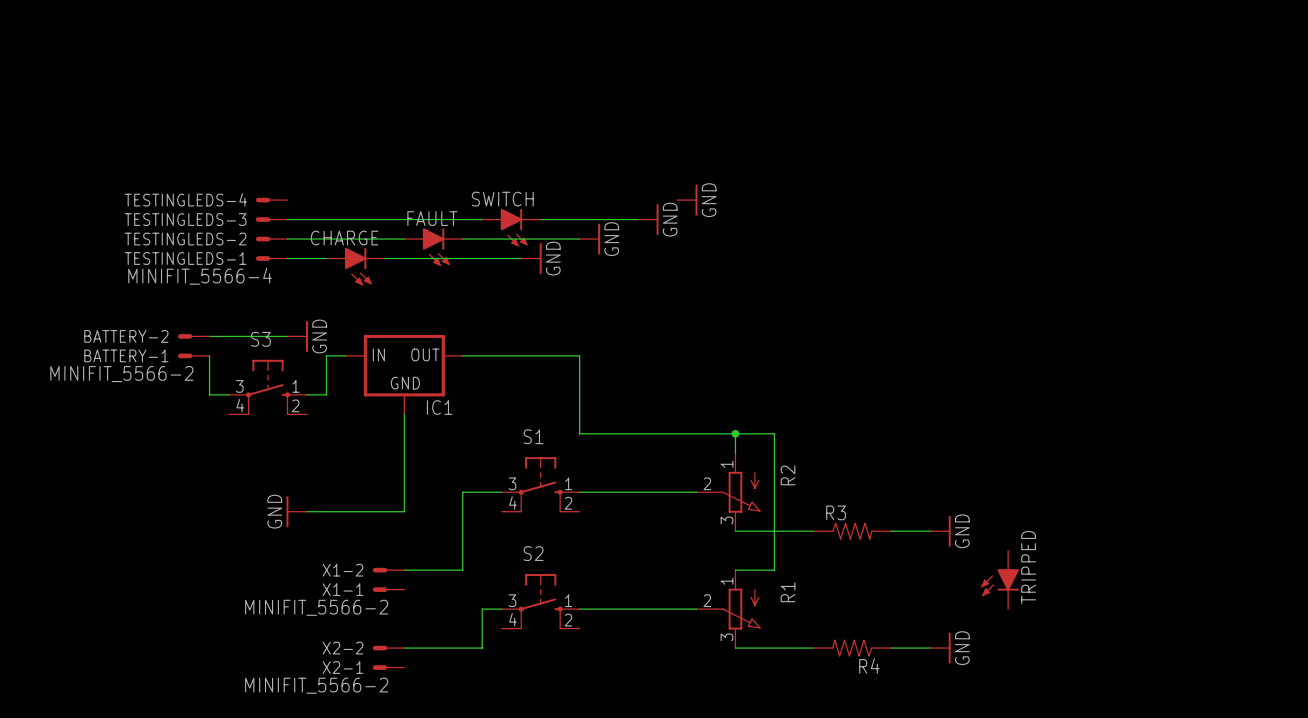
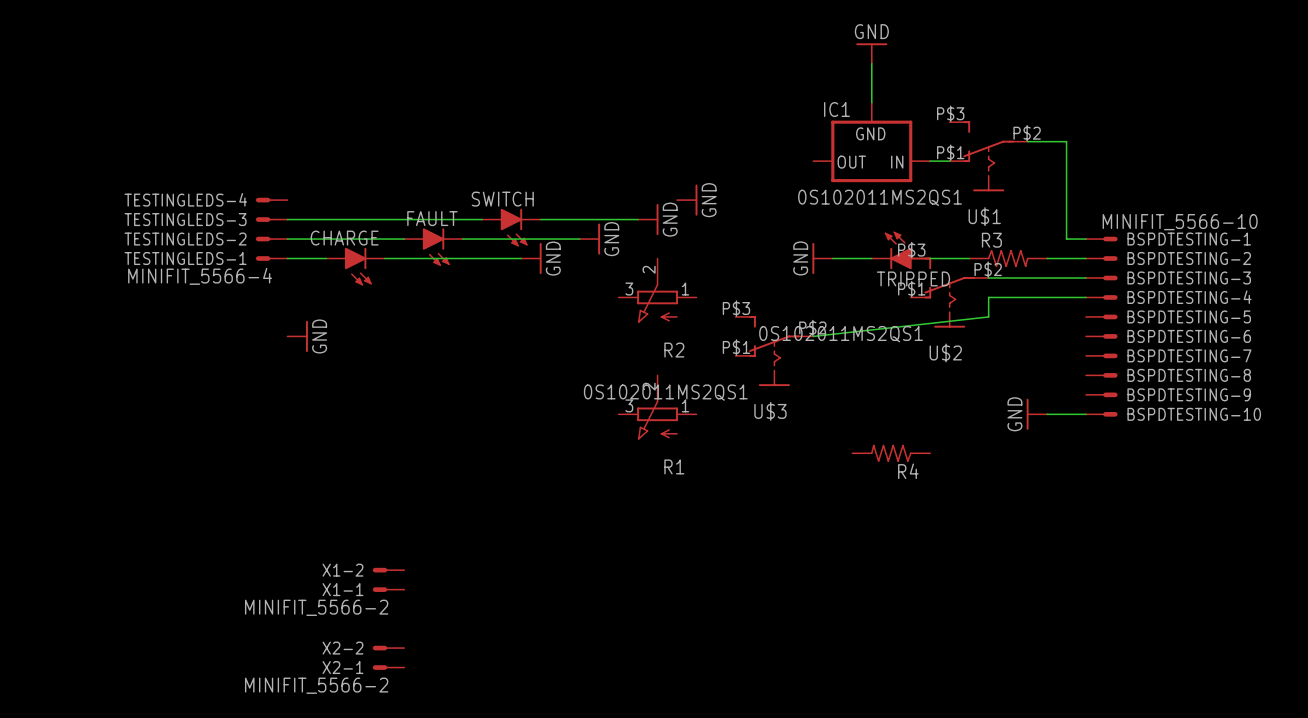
power symbol: none -> GND (871, 53)
wire: none -> (871, 63) (871, 102)
wire: none -> (1027, 141) (1066, 141) (1066, 239) (1086, 239)
U$1: none -> 0S102011MS2QS1 (988, 156)
wire: none -> (930, 161) (949, 161)
BSPDTESTING-1: none -> MINIFIT_5566-10 (1101, 239)
TRIPPED: none -> (901, 250)
power symbol: none -> GND (822, 258)
wire: none -> (832, 258) (871, 258)
wire: none -> (930, 258) (969, 258)
wire: none -> (1047, 258) (1086, 258)
BSPDTESTING-2: none -> (1101, 258)
wire: none -> (988, 277) (1086, 277)
BSPDTESTING-3: none -> (1101, 277)
U$2: none -> 0S102011MS2QS1 (949, 292)
wire: none -> (1086, 297) (988, 297) (988, 316) (813, 336)
BSPDTESTING-4: none -> (1101, 297)
BSPDTESTING-5: none -> (1101, 316)
IC1 symbol: [345, 334, 463, 415] -> [813, 102, 931, 183]
BATTERY-2: (193, 336) -> none
wire: (209, 336) (287, 336) -> none
BSPDTESTING-6: none -> (1101, 336)
U$3: none -> 0S102011MS2QS1 (774, 351)
BATTERY-1: MINIFIT_5566-2 (193, 355) -> none
wire: (209, 355) (209, 394) (229, 394) -> none
wire: (345, 355) (326, 355) (326, 394) (306, 394) -> none
wire: (462, 355) (579, 355) (579, 433) (774, 433) (774, 570) (735, 570) -> none
BSPDTESTING-7: none -> (1101, 355)
BSPDTESTING-8: none -> (1101, 375)
S3: (267, 387) -> none
BSPDTESTING-9: none -> (1101, 394)
IC1 name position: IC1 (439, 407) -> IC1 (836, 109)
wire: (404, 414) (404, 511) (306, 511) -> none
power symbol: none -> GND (1036, 414)
wire: none -> (1047, 414) (1086, 414)
BSPDTESTING-10: none -> (1101, 414)
wire: (735, 433) (735, 453) -> none
junction: (735, 433) -> none
S1: (540, 484) -> none
wire: (501, 492) (462, 492) (462, 570) (404, 570) -> none
wire: (579, 492) (696, 492) -> none
R2 position: (728, 492) -> (657, 290)
R2 rotation: 0° (737, 492) -> 90° clockwise (657, 299)
power symbol: GND (296, 511) -> none
wire: (735, 531) (813, 531) -> none
R3 position: (852, 531) -> (1008, 258)
wire: (891, 531) (930, 531) -> none
power symbol: GND (940, 531) -> none
TRIPPED: (1000, 579) -> none
S2: (540, 601) -> none
wire: (501, 609) (482, 609) (482, 648) (404, 648) -> none
wire: (579, 609) (696, 609) -> none
R1 position: (728, 609) -> (657, 407)
R1 rotation: 0° (737, 609) -> 90° clockwise (657, 416)
wire: (735, 648) (813, 648) -> none
R4 position: (852, 648) -> (891, 453)
wire: (891, 648) (930, 648) -> none
power symbol: GND (940, 648) -> none

